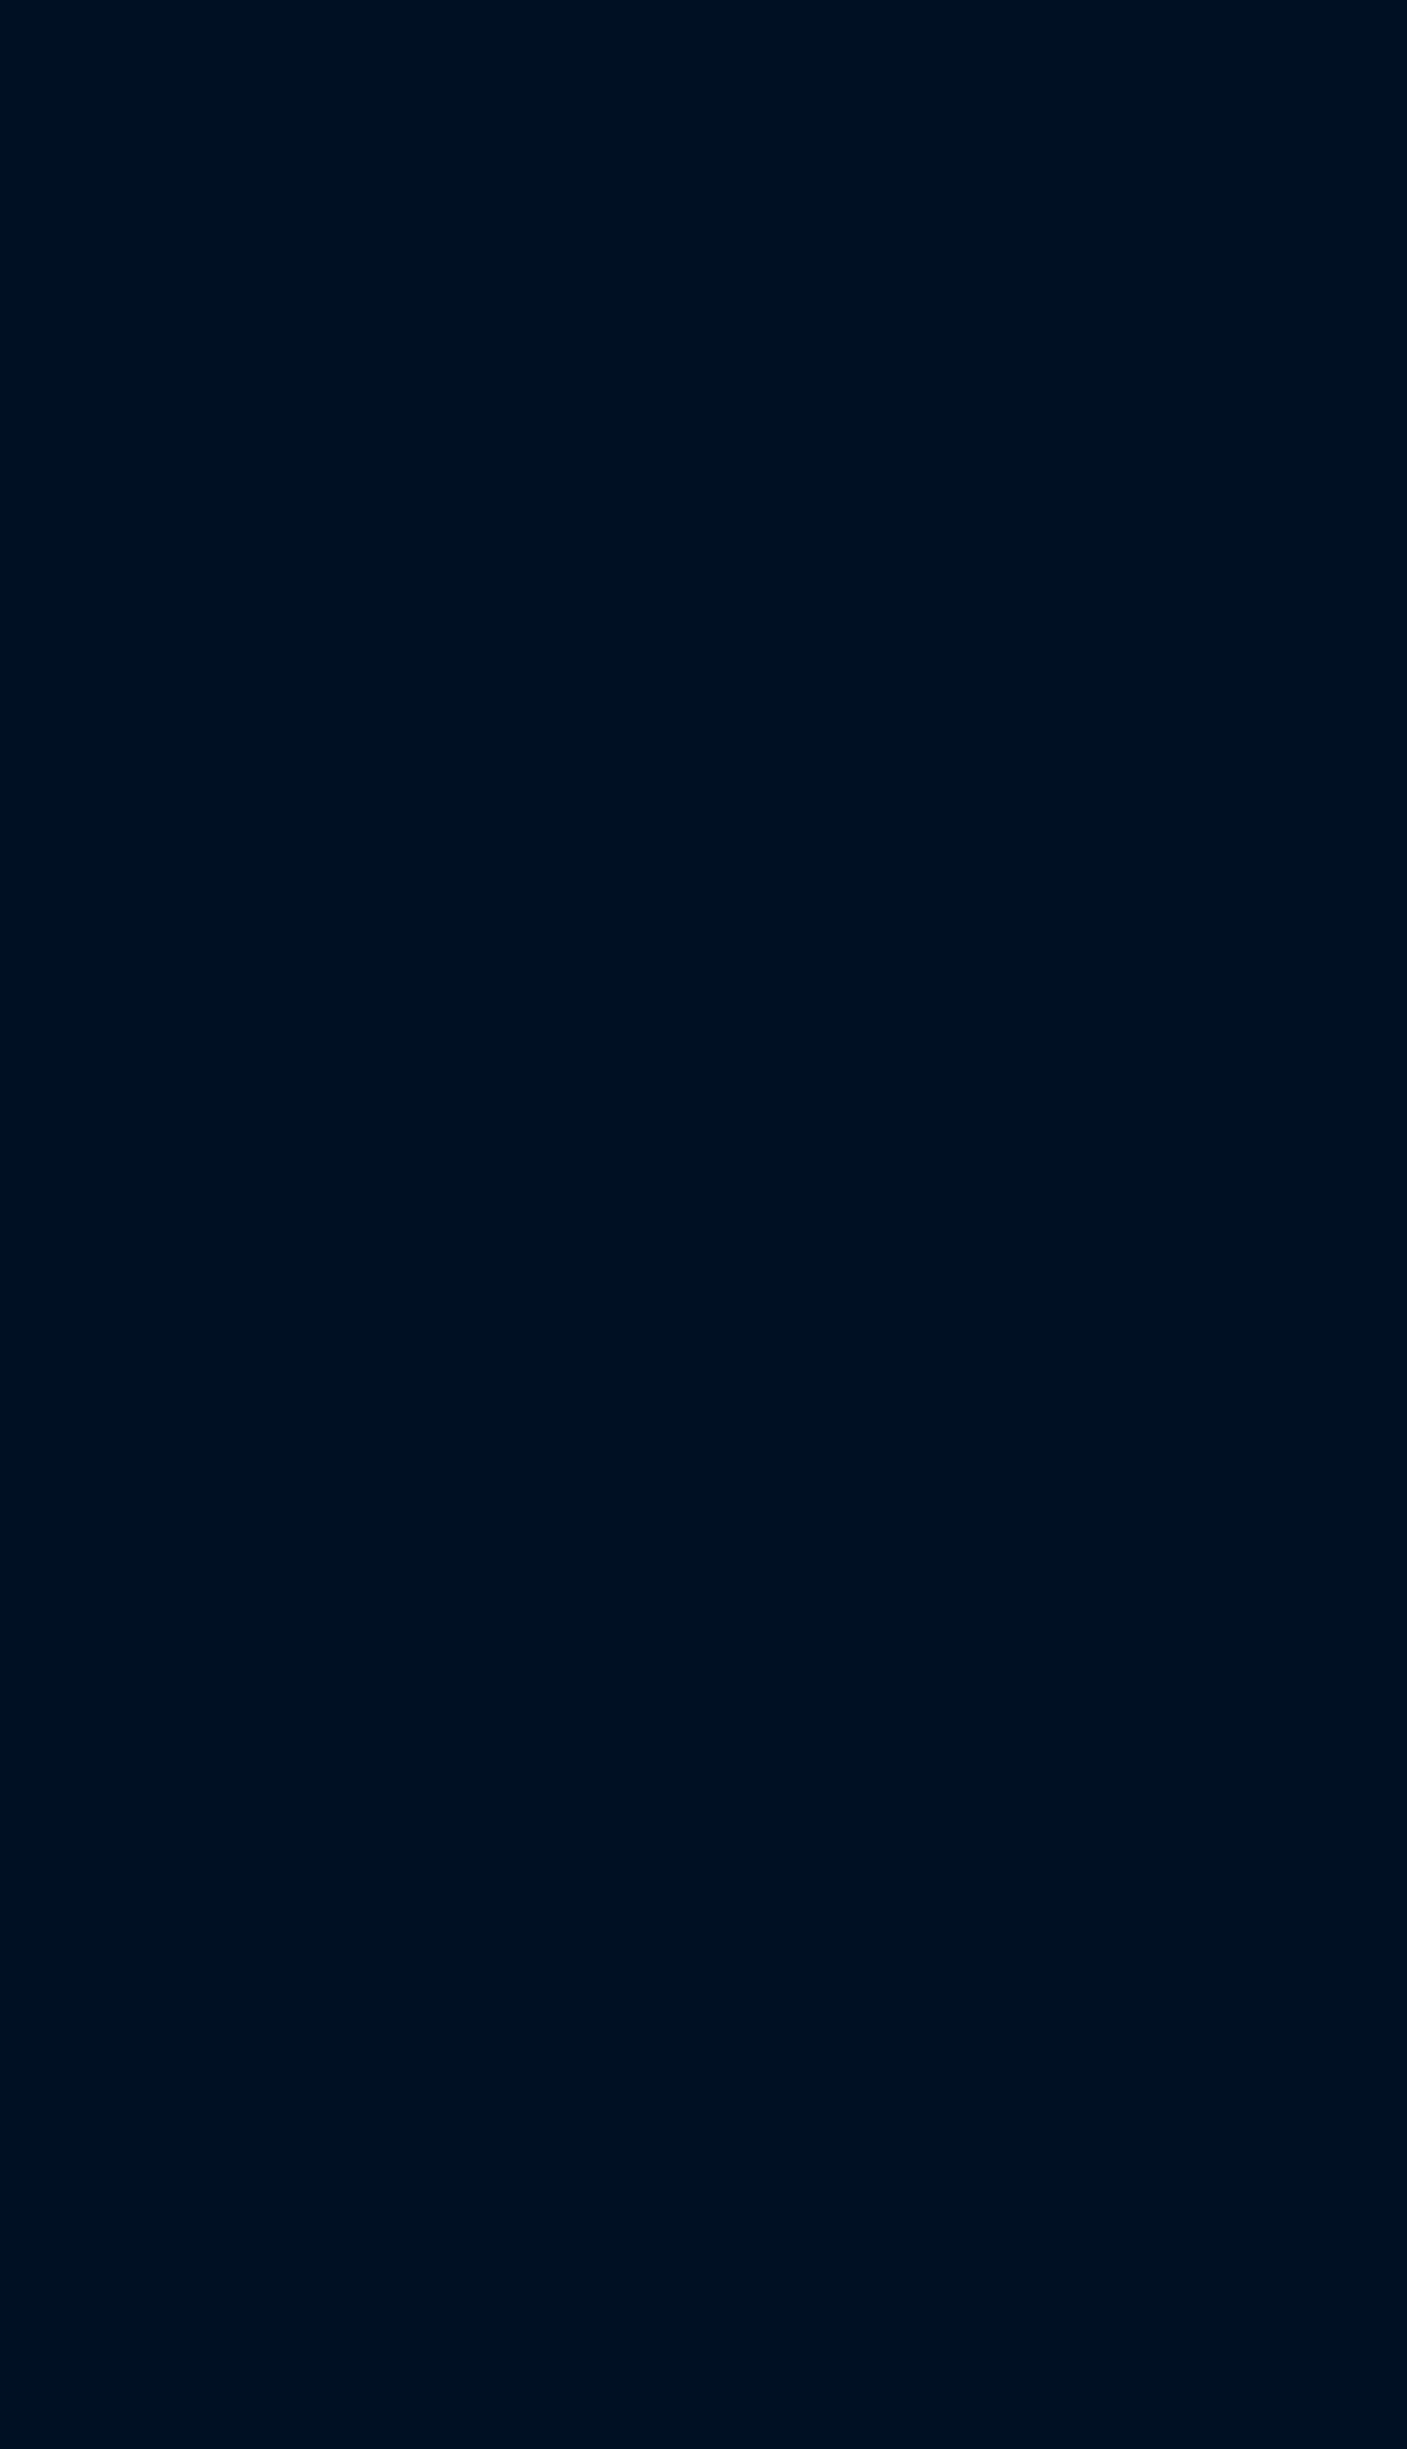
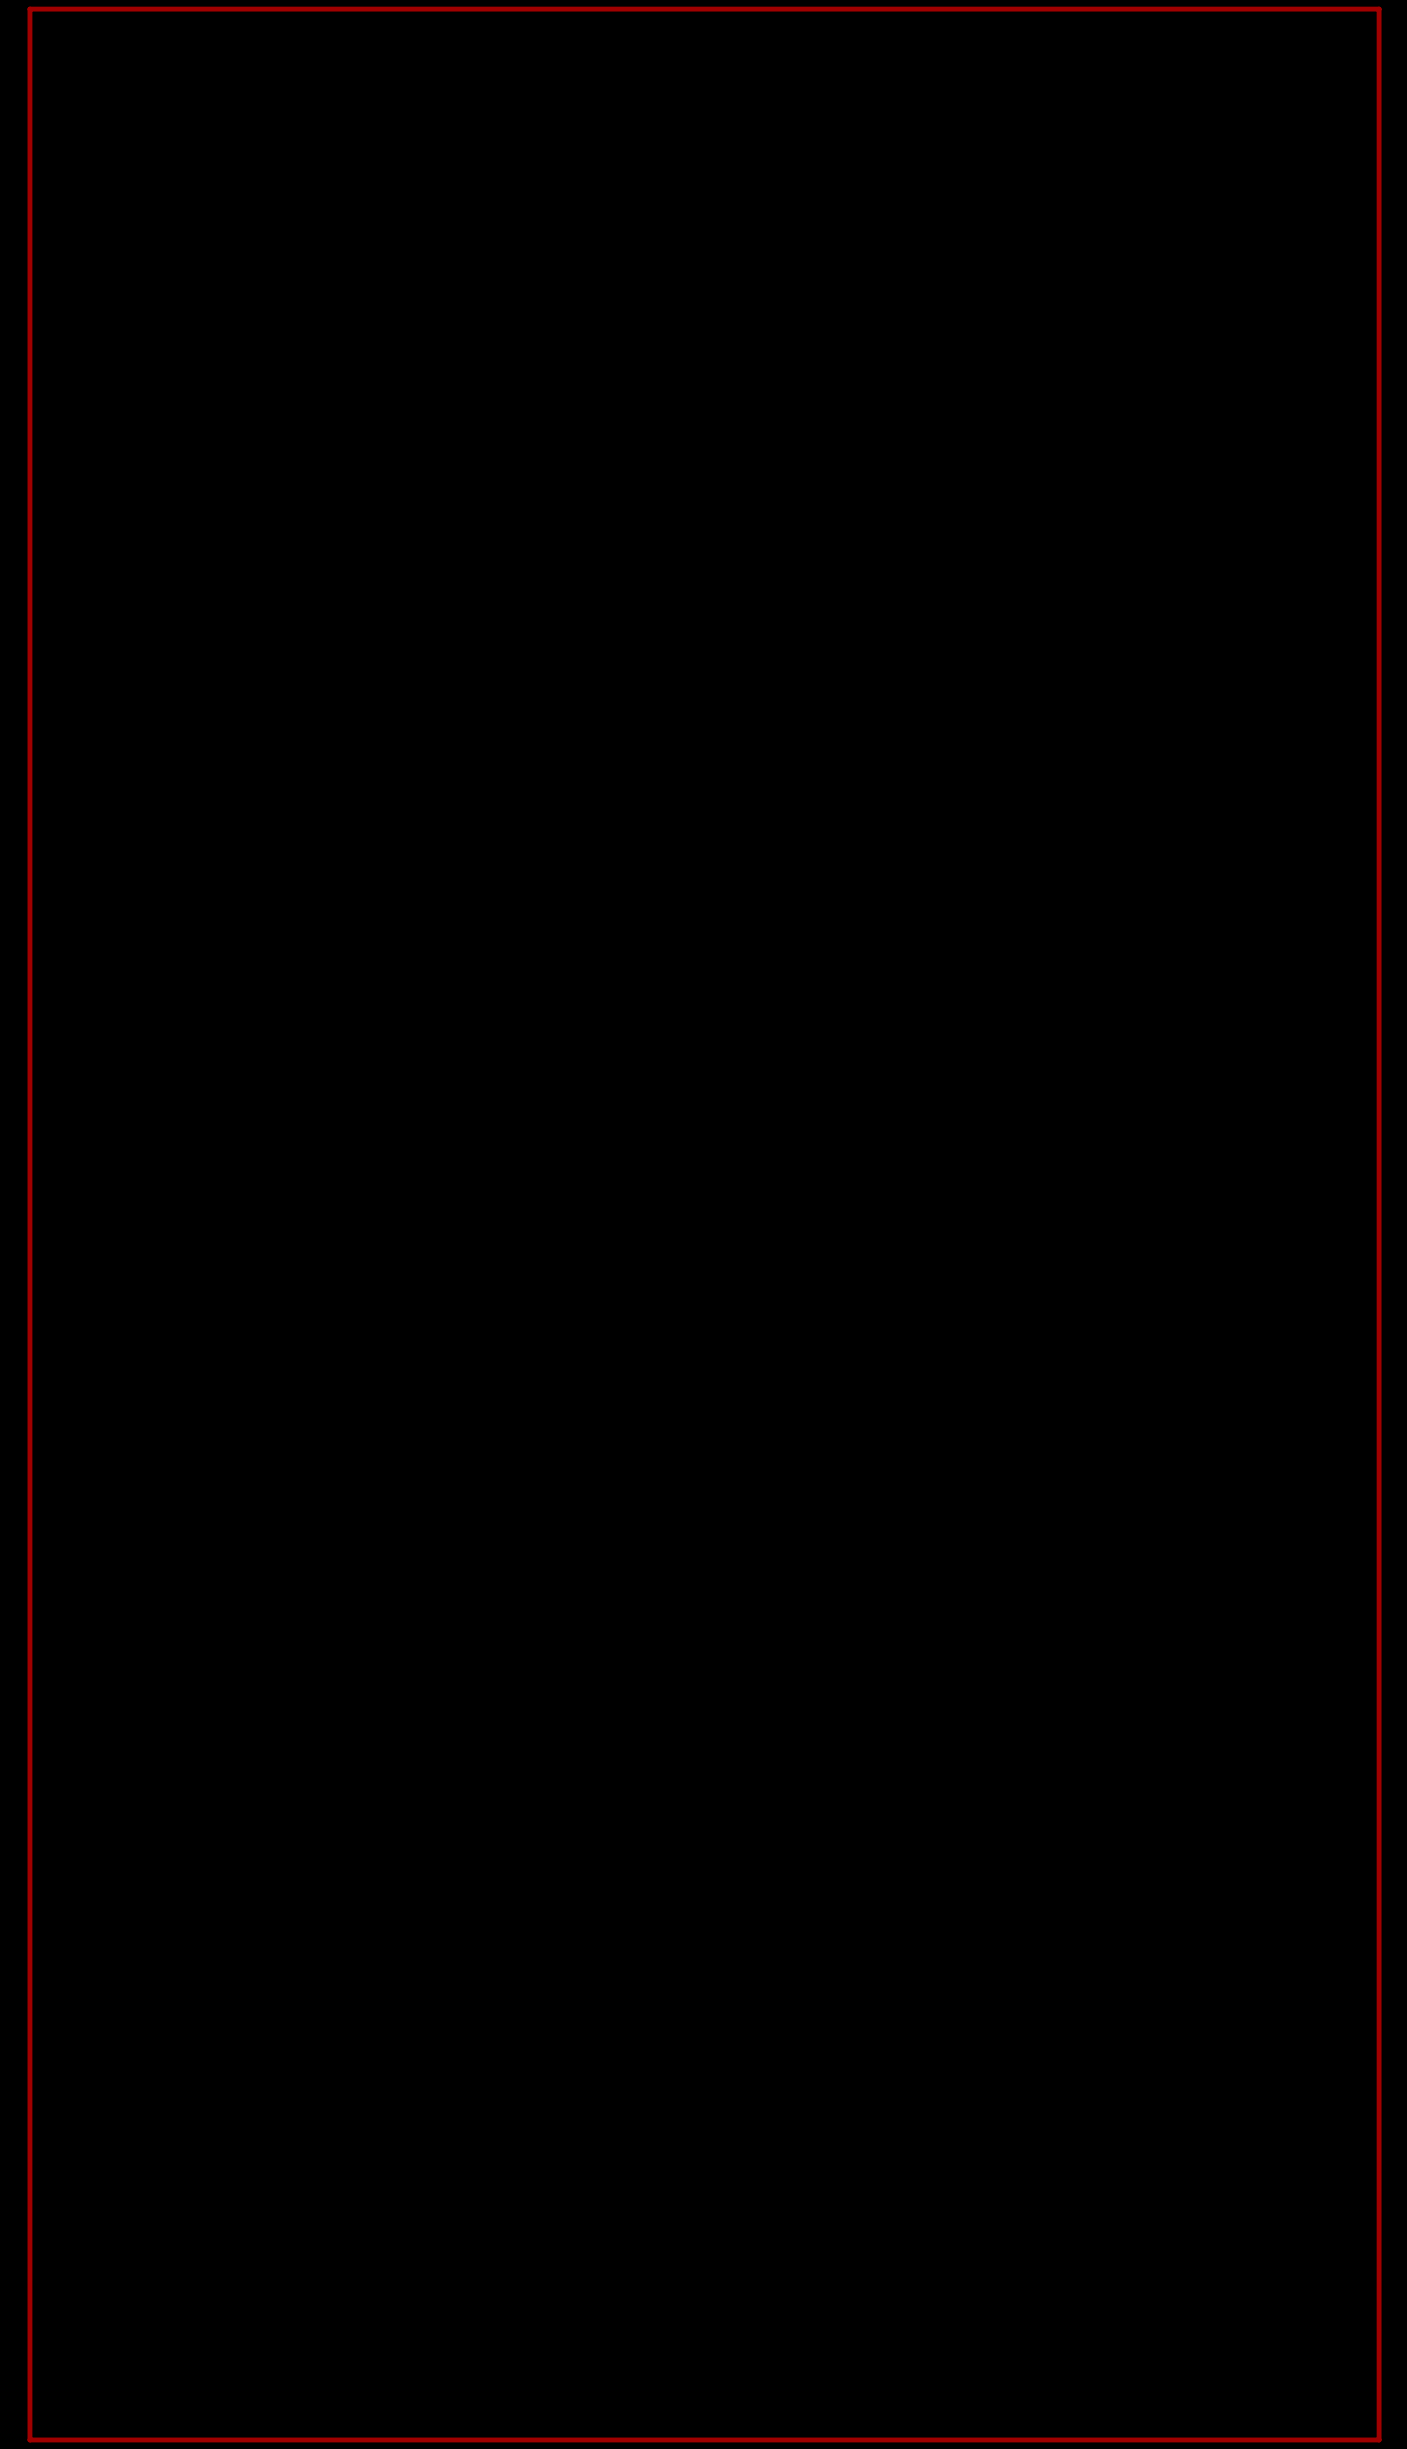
track: none -> (29, 9) (1379, 9) (1379, 2439) (29, 2439) (29, 9)

